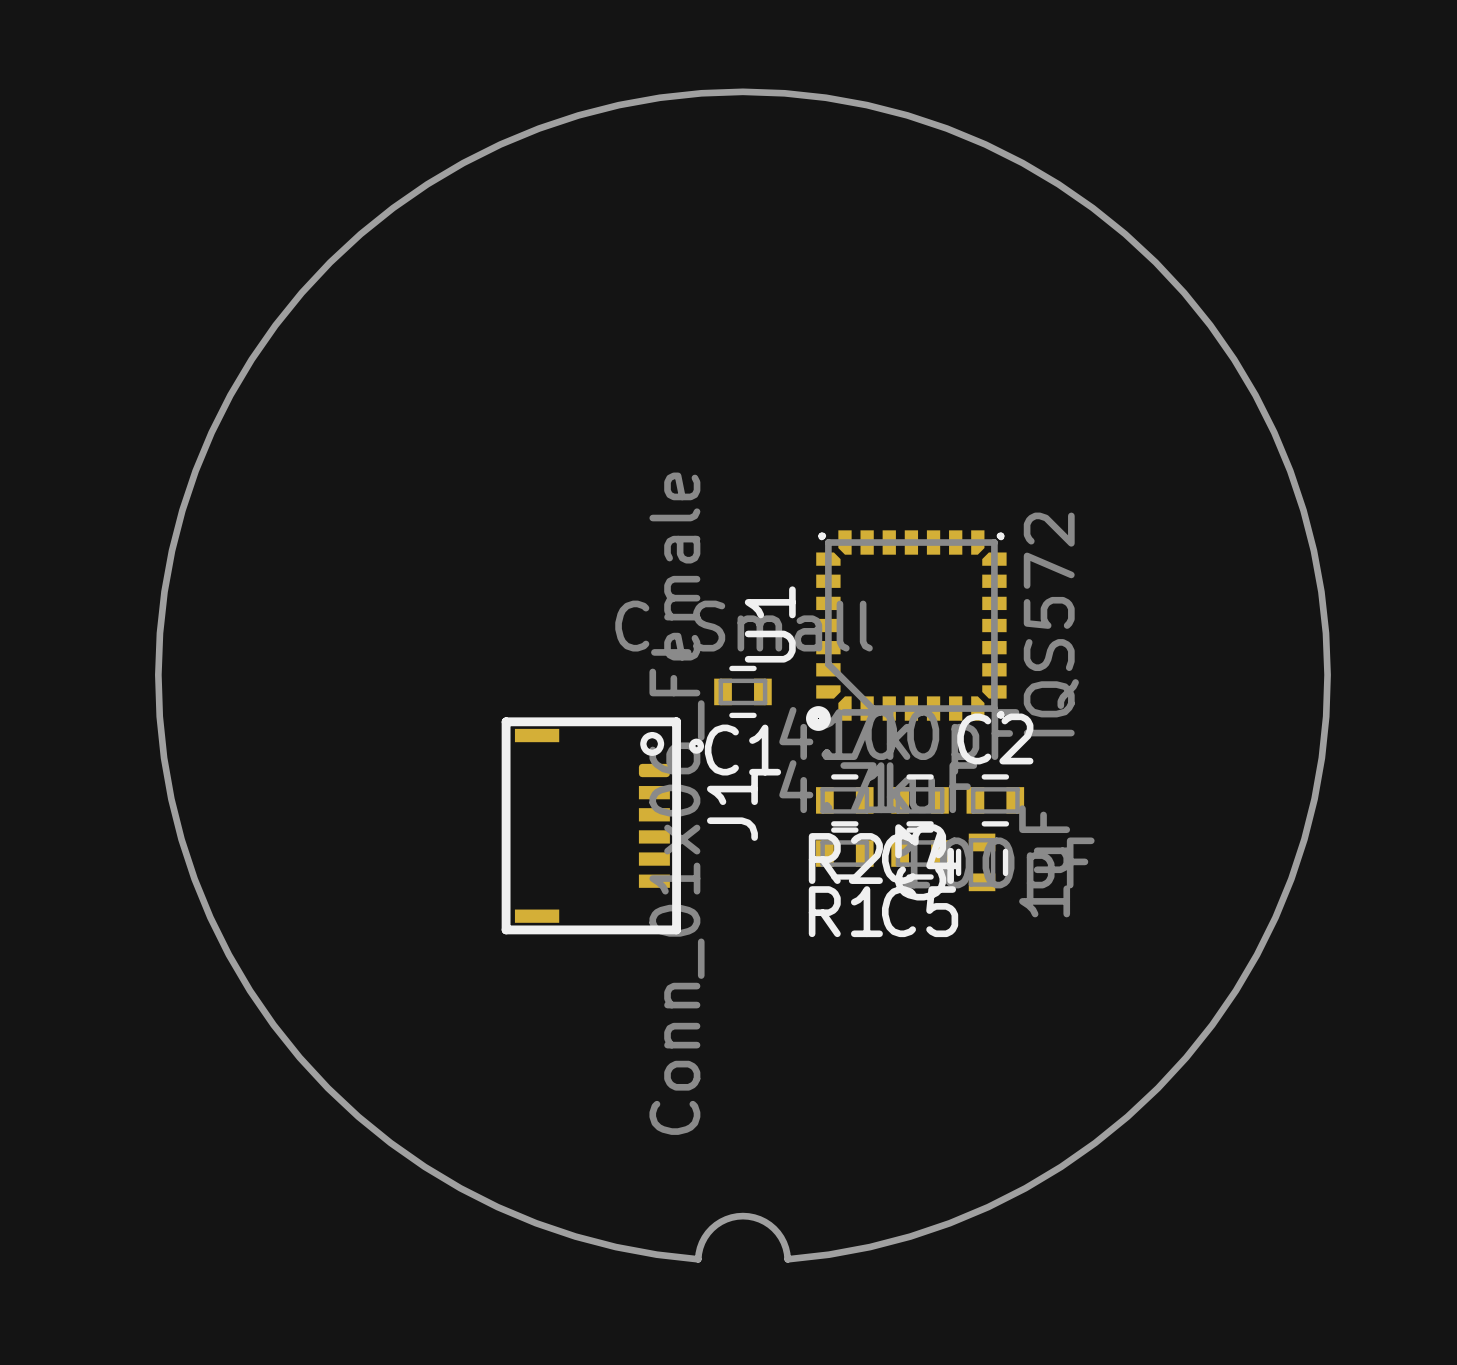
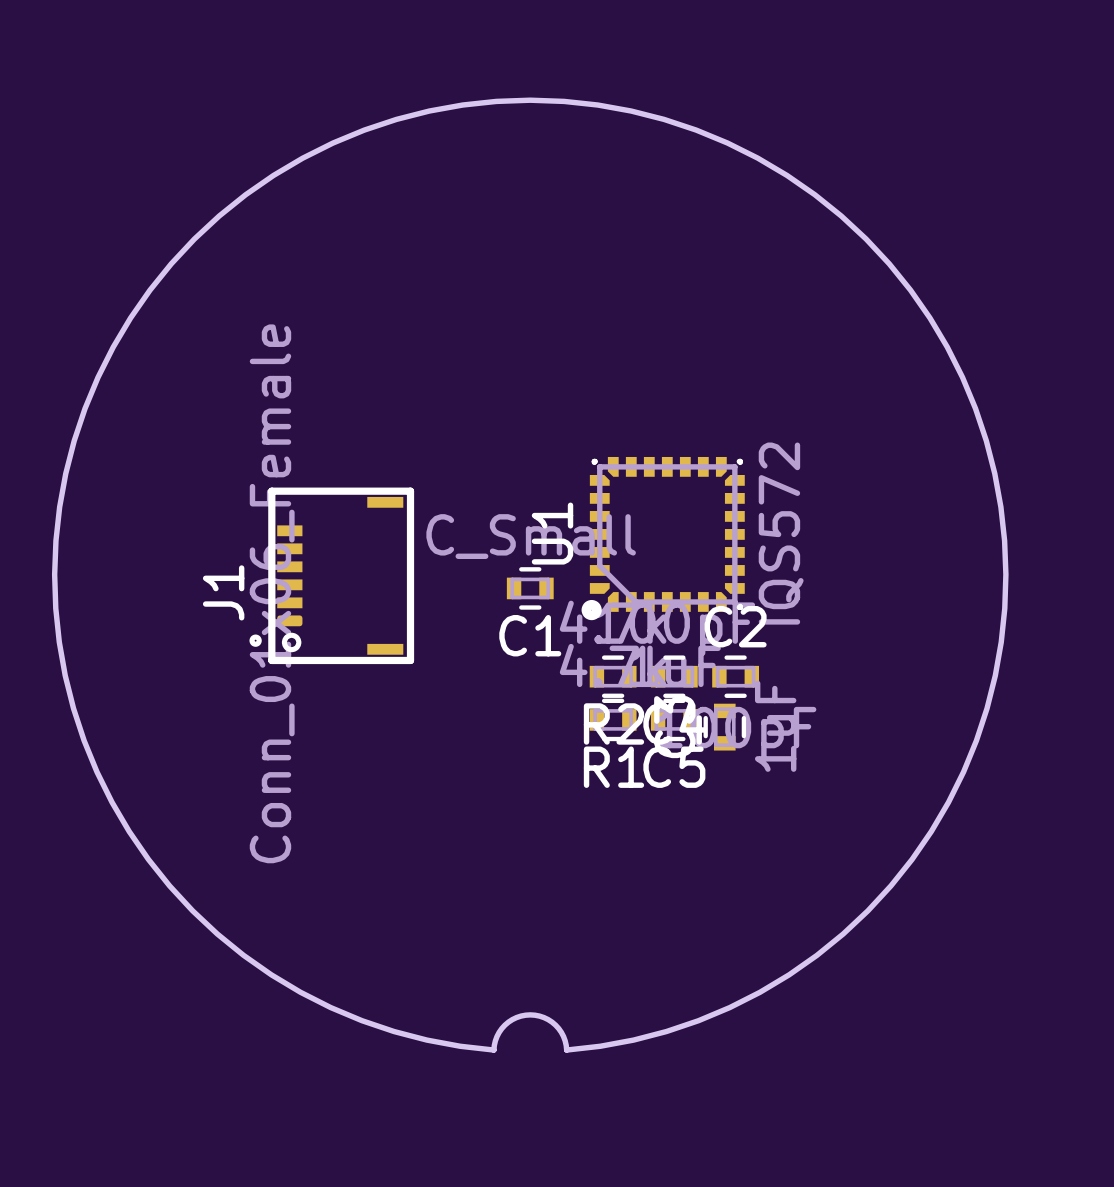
J1 rotation: 0° (602, 825) -> 180° (331, 575)
J1 position: (602, 825) -> (331, 575)

